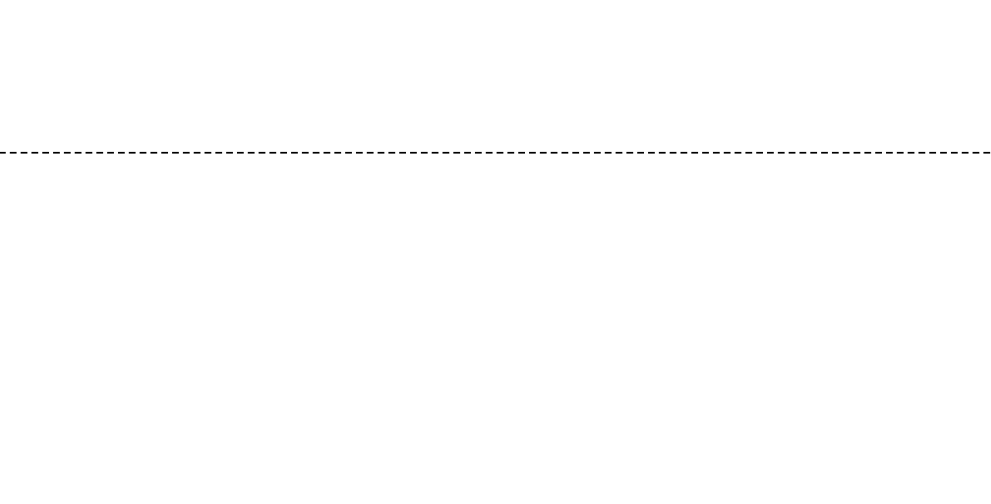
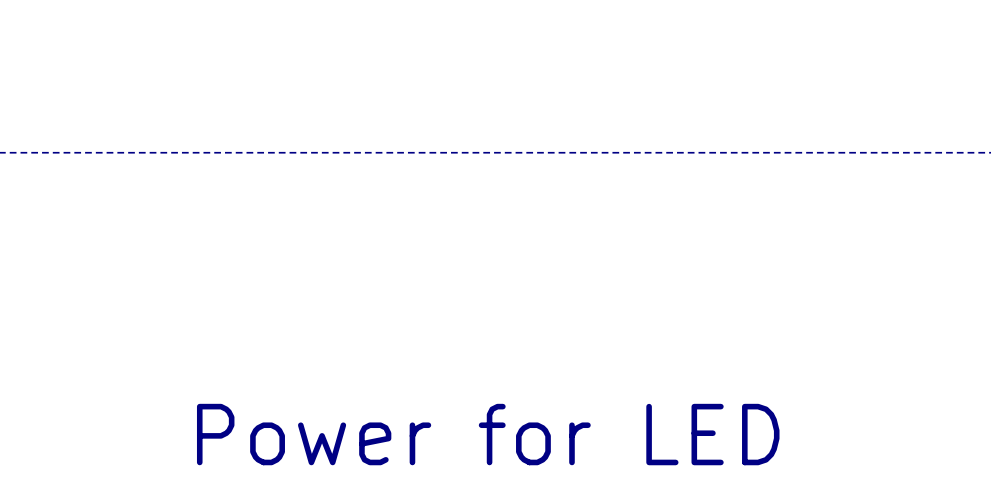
text: none -> Power for LED (488, 434)

